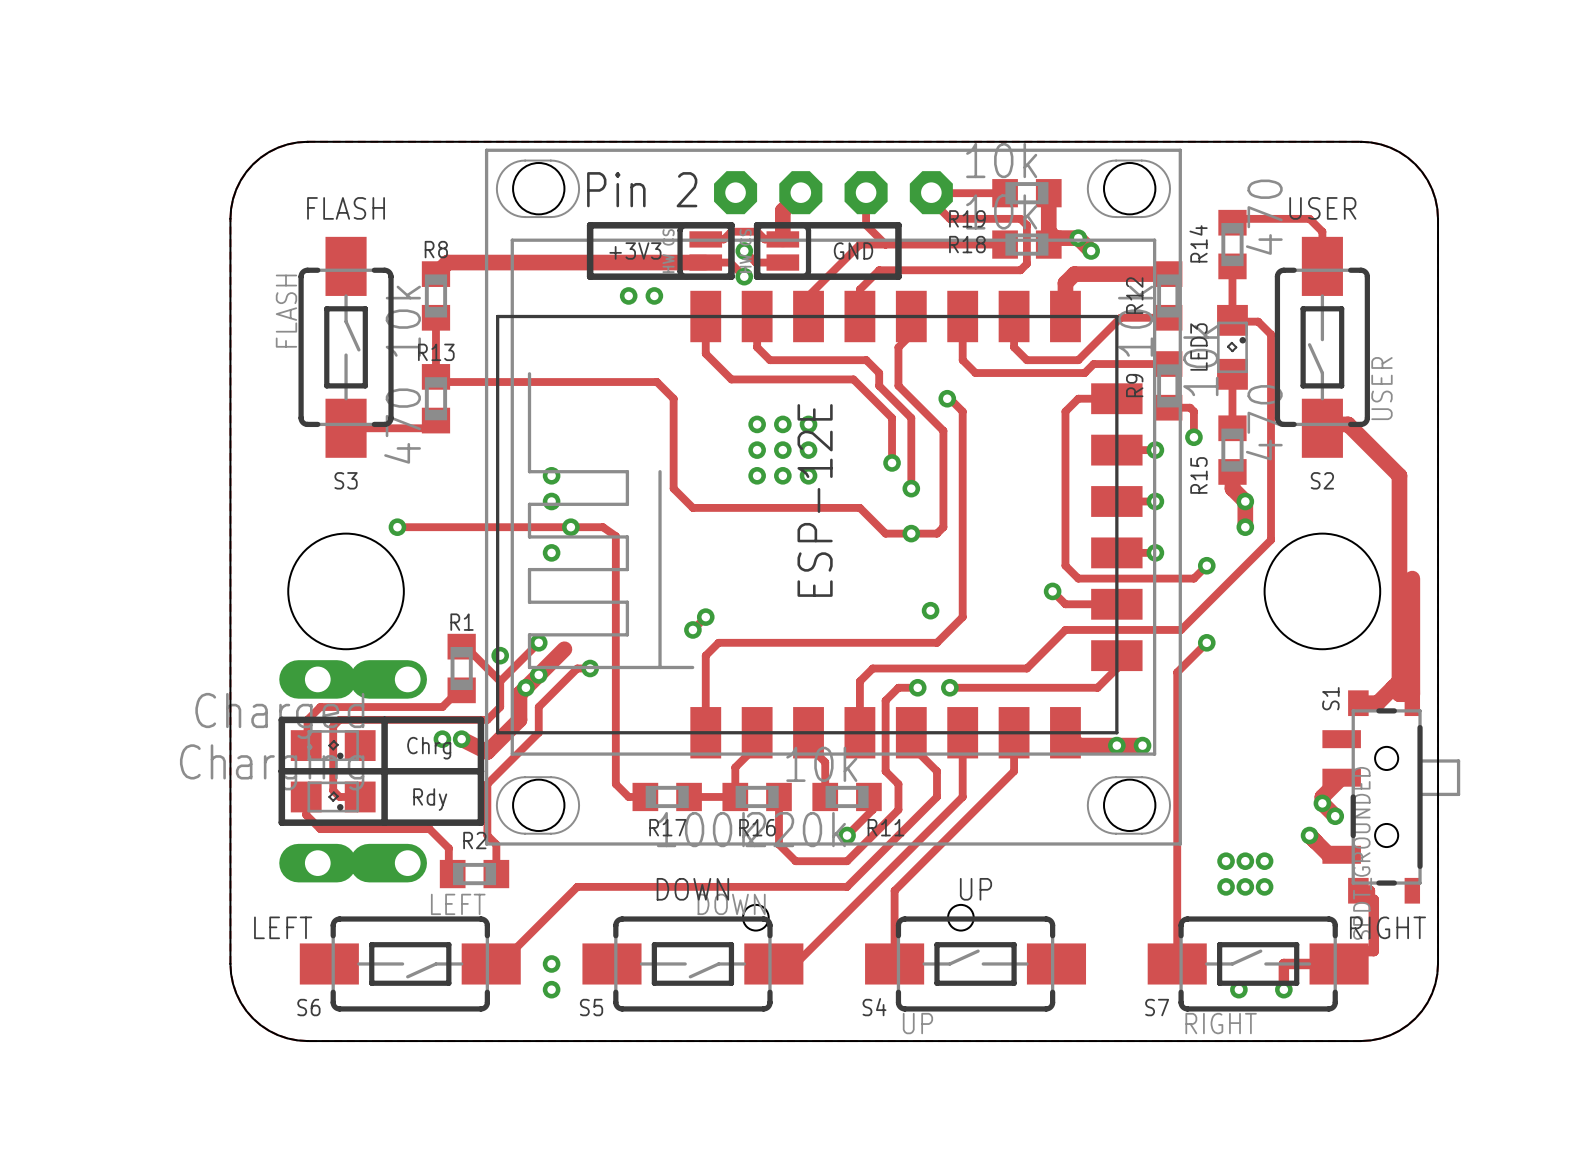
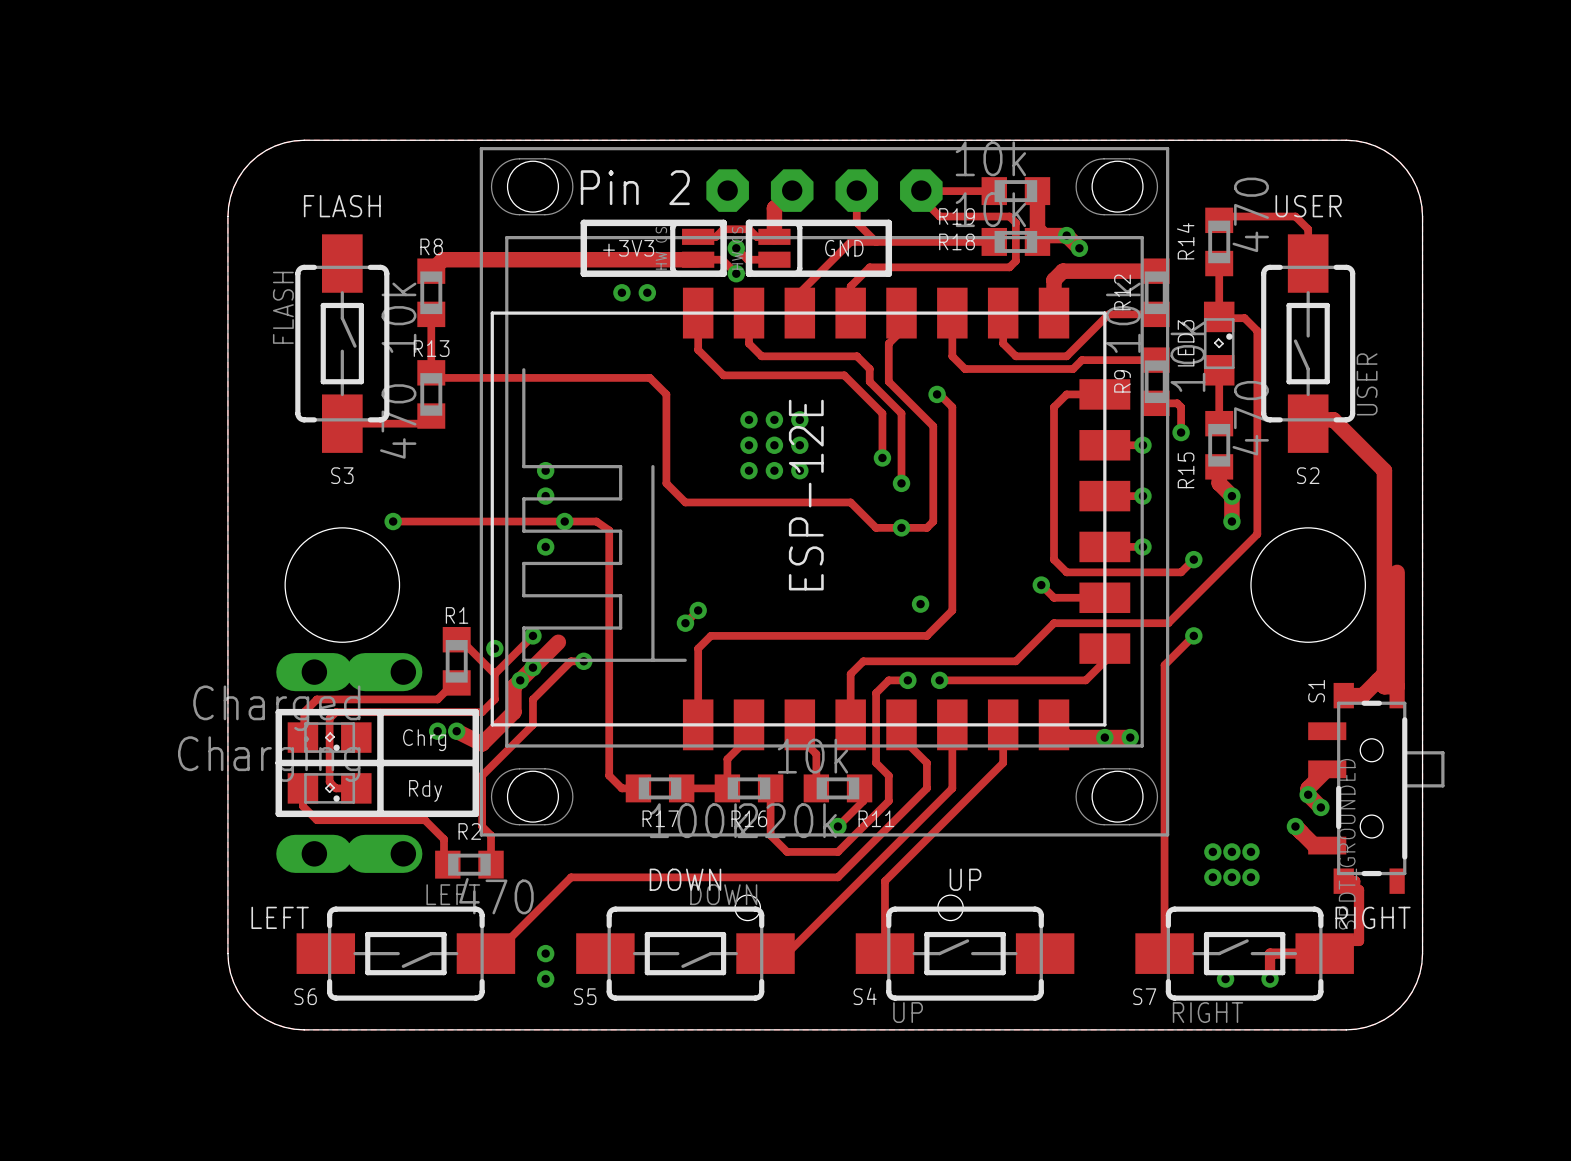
R2 value: none -> 470 (496, 896)

